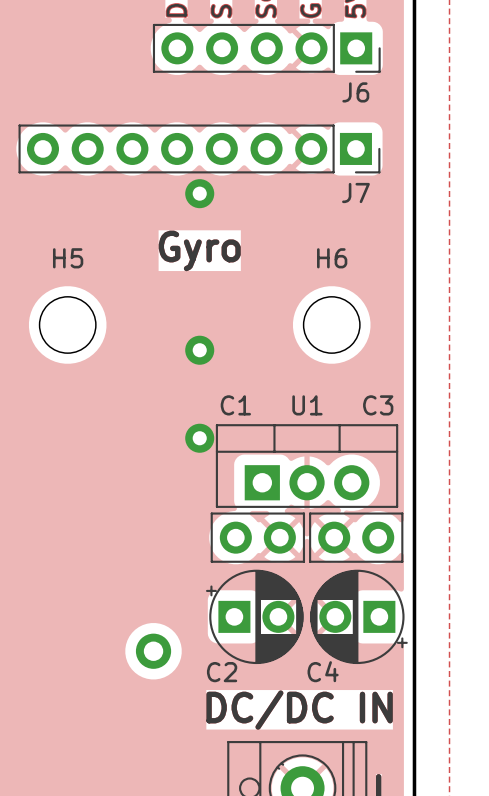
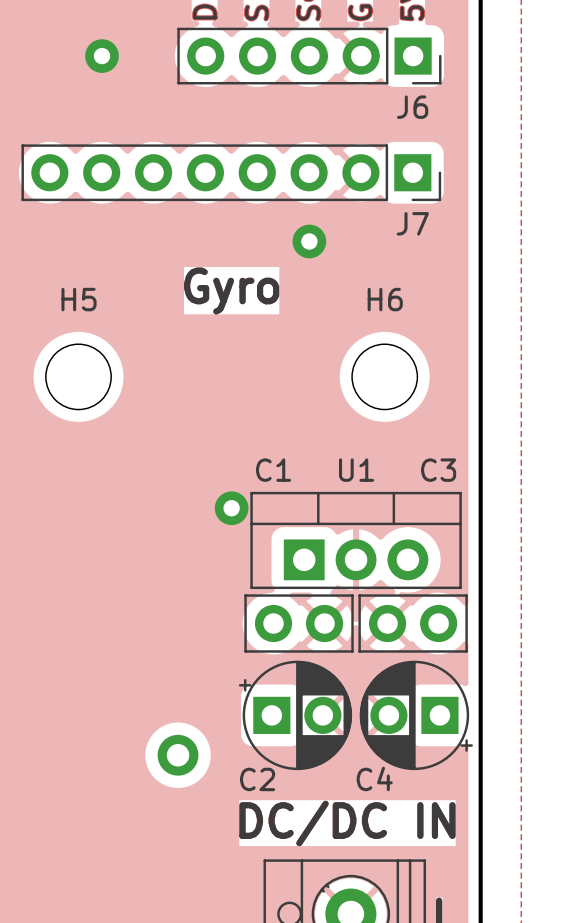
via: none -> (102, 56)
via position: (199, 193) -> (309, 241)
via: (199, 350) -> none

